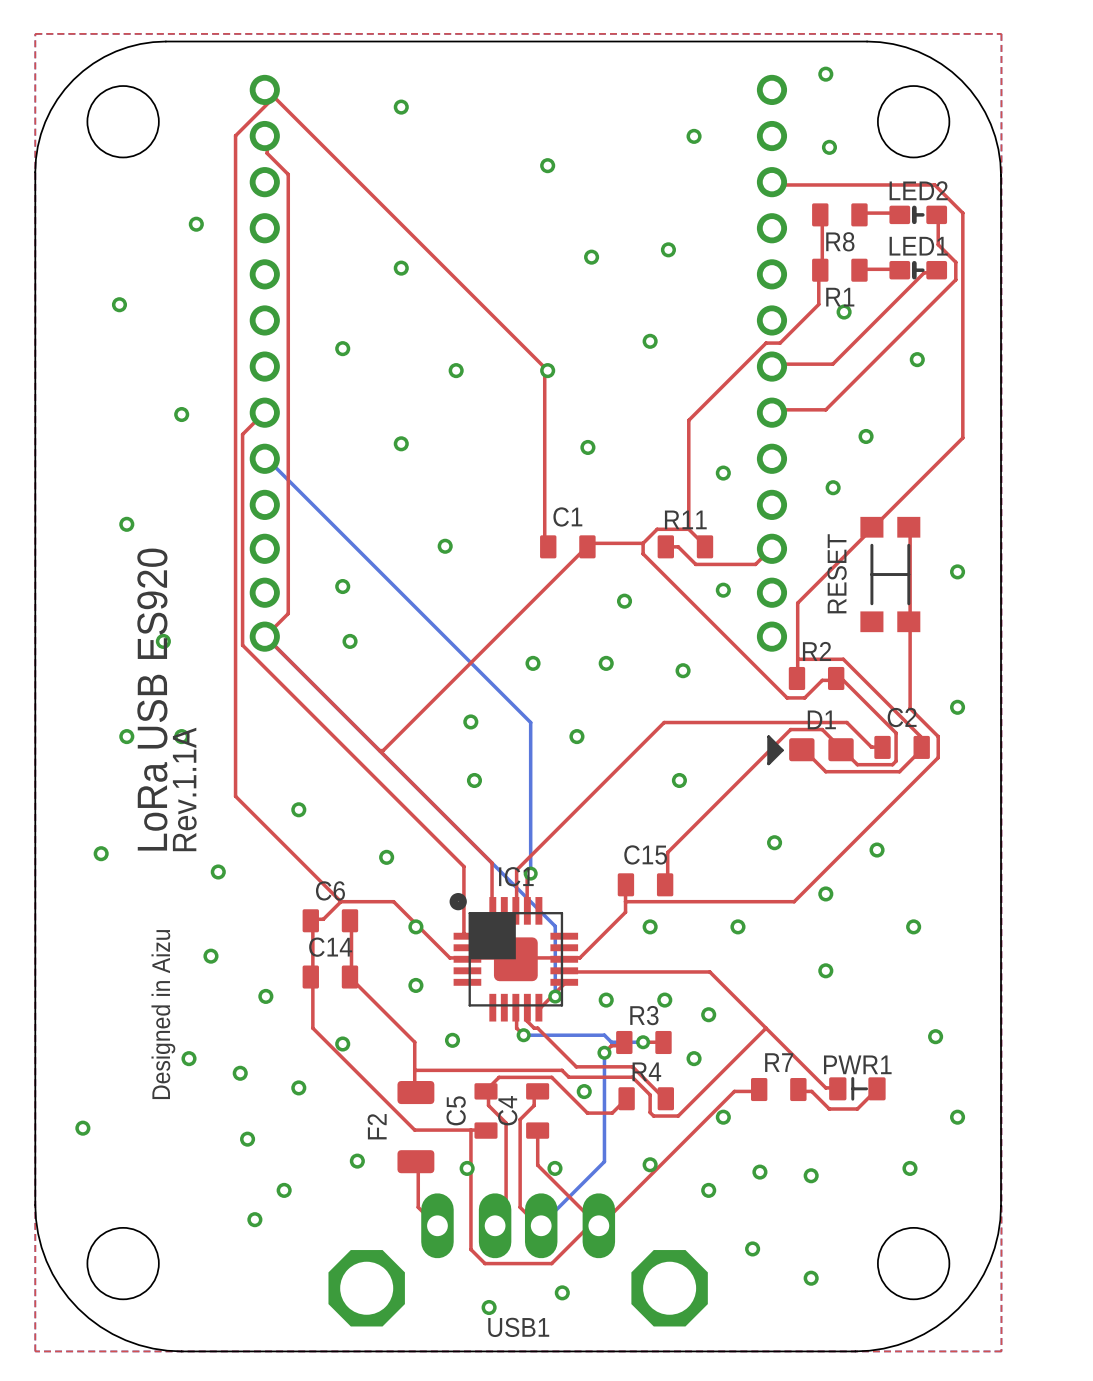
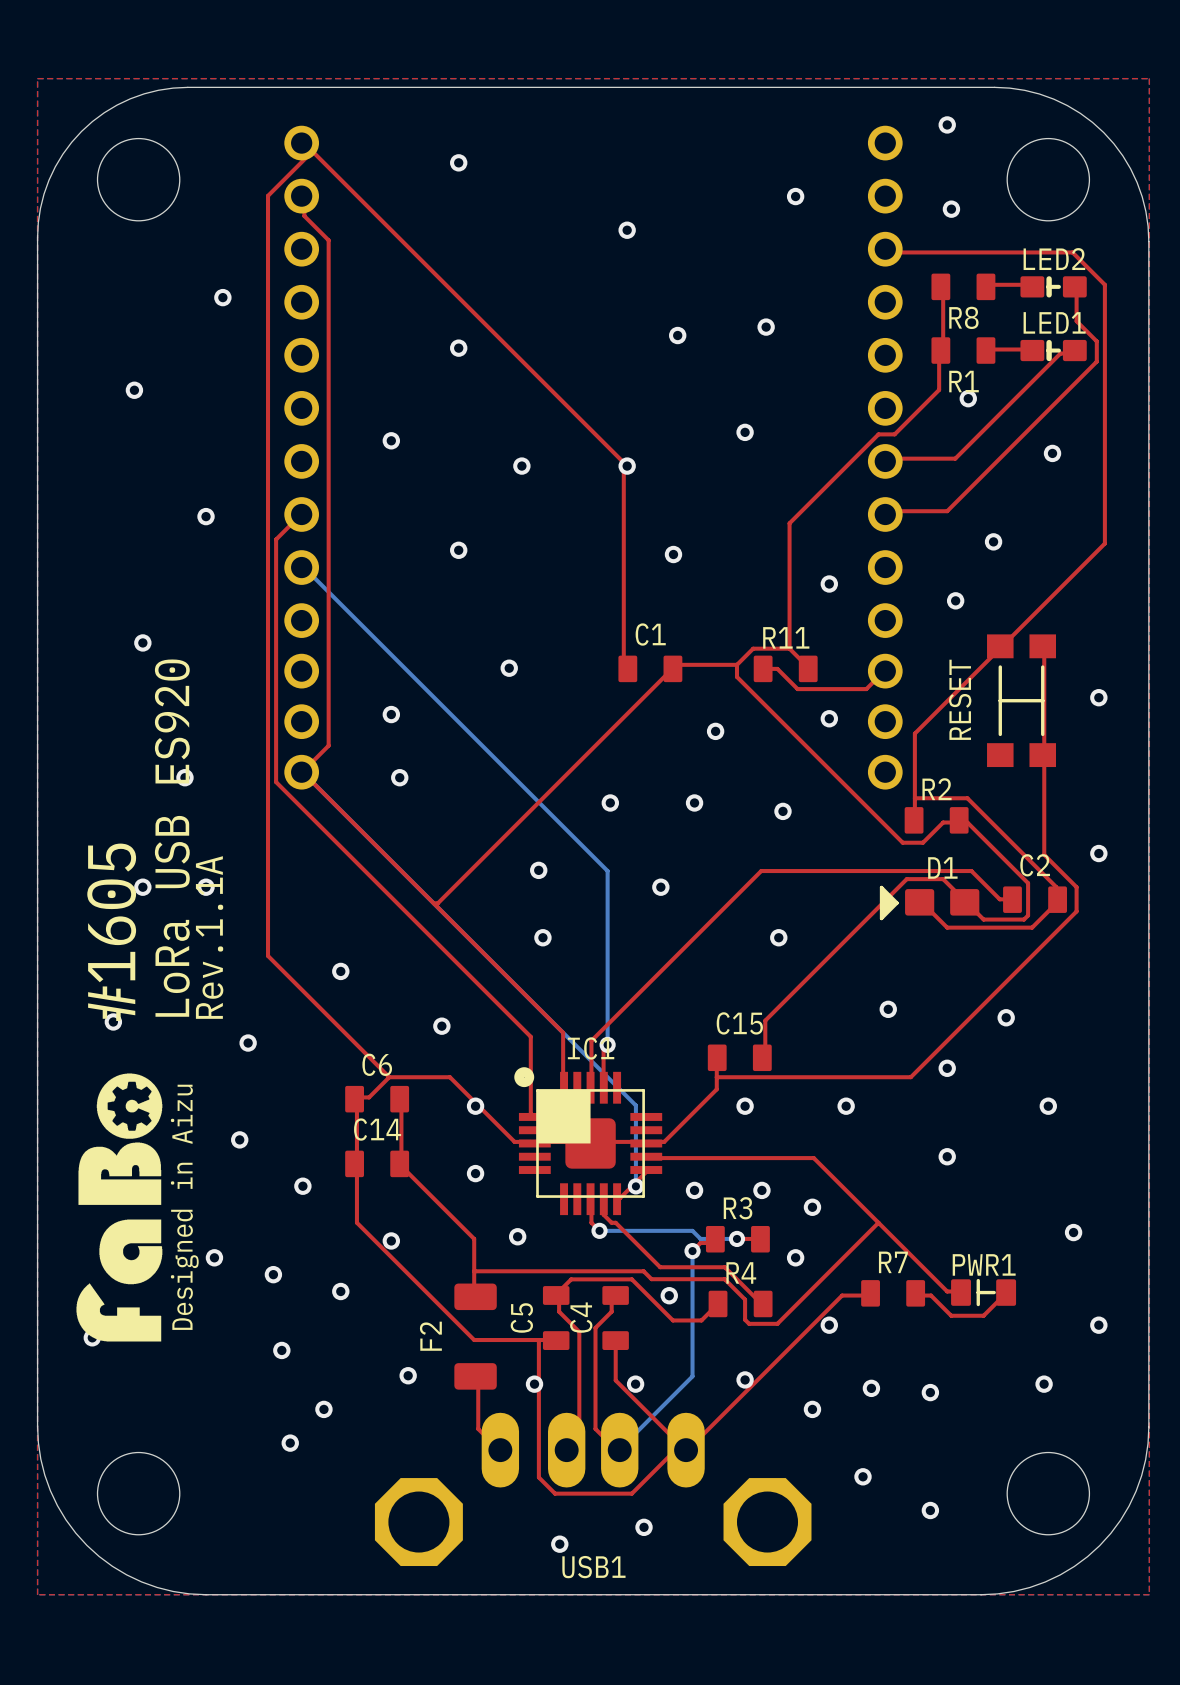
text: none -> #1605 (111, 932)
drawing: none -> [76, 1073, 163, 1342]

